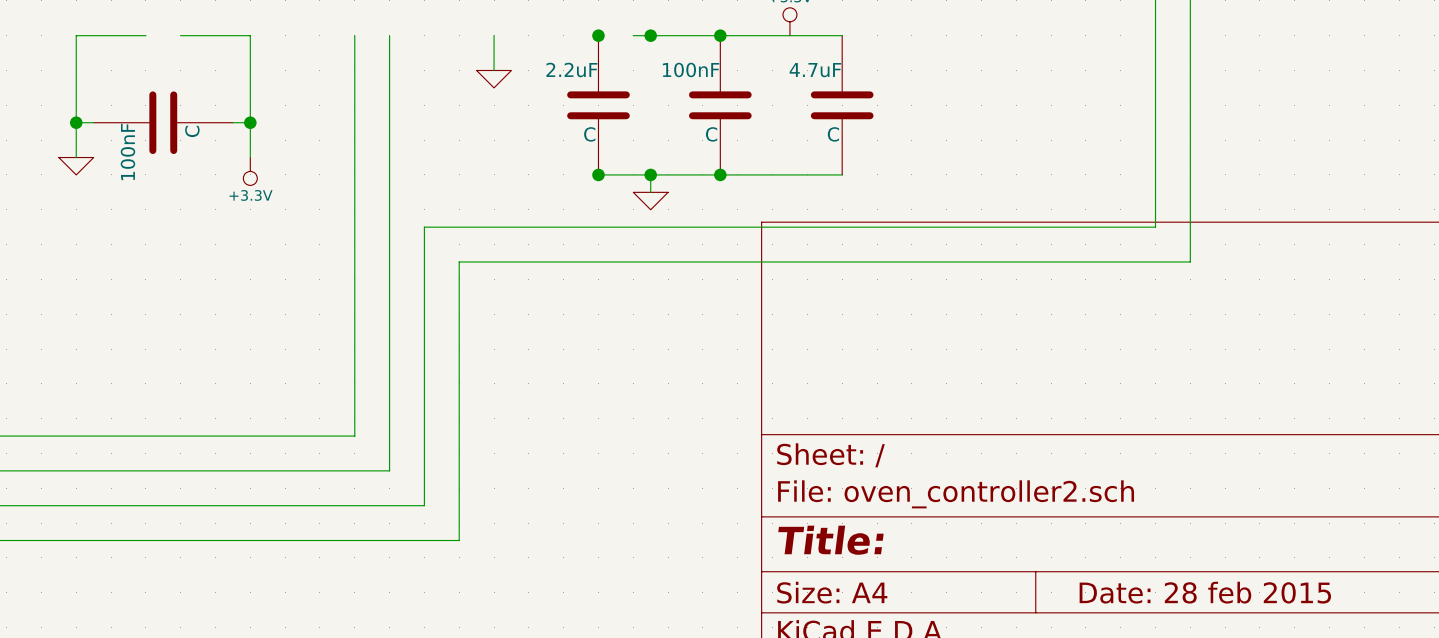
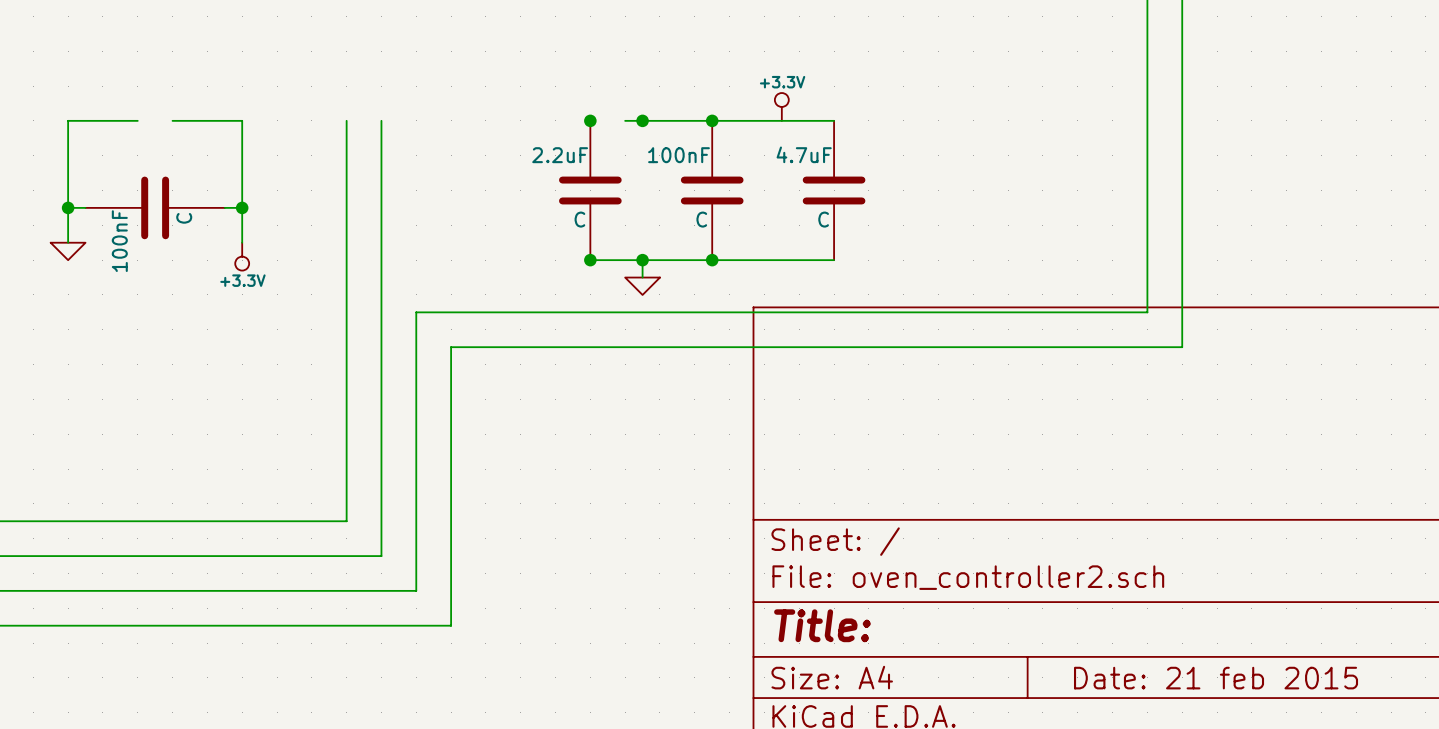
wire: (494, 35) (494, 70) -> none
power symbol: (494, 79) -> none
title block: Date: 28 feb 2015 (1205, 592) -> Date: 21 feb 2015 (1216, 678)

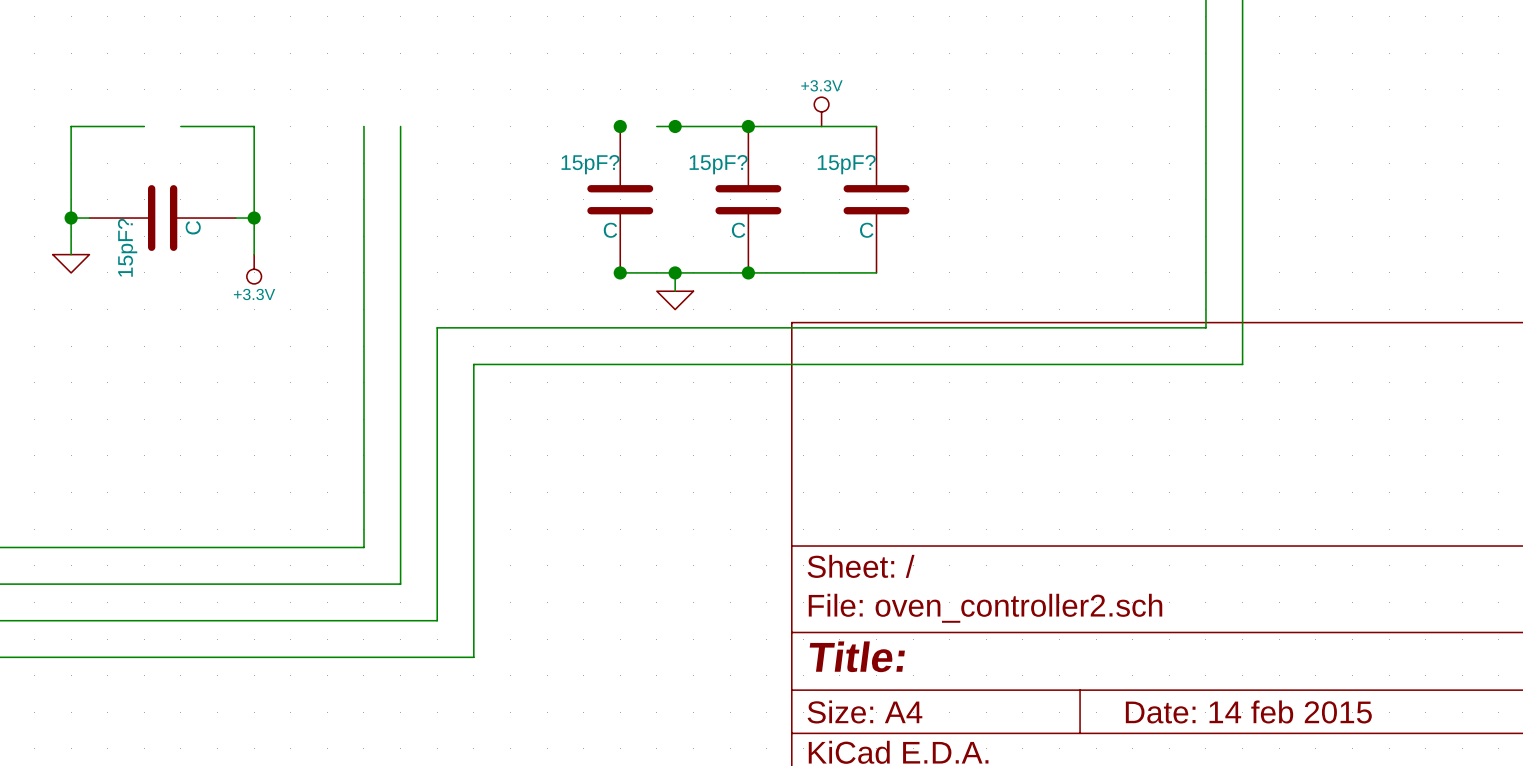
4.7uF name: 4.7uF (804, 154) -> 15pF? (846, 164)
2.2uF name: 2.2uF (560, 155) -> 15pF? (590, 164)
100nF name: 100nF (679, 155) -> 15pF? (718, 164)
100nF name: 100nF (119, 241) -> 15pF? (127, 247)
title block: Date: 21 feb 2015 (1216, 678) -> Date: 14 feb 2015 (1248, 711)

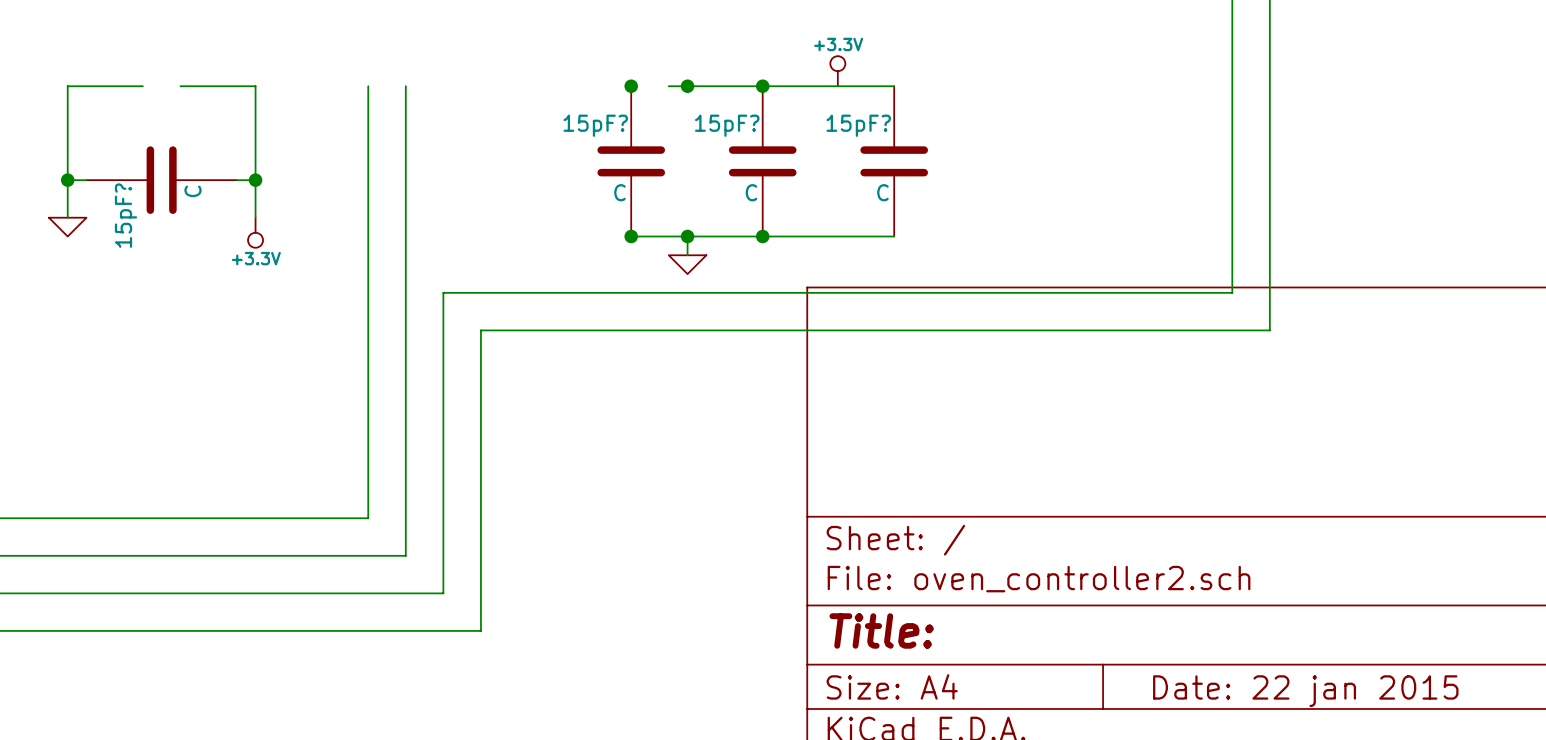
title block: Date: 14 feb 2015 (1248, 711) -> Date: 22 jan 2015 (1305, 691)

